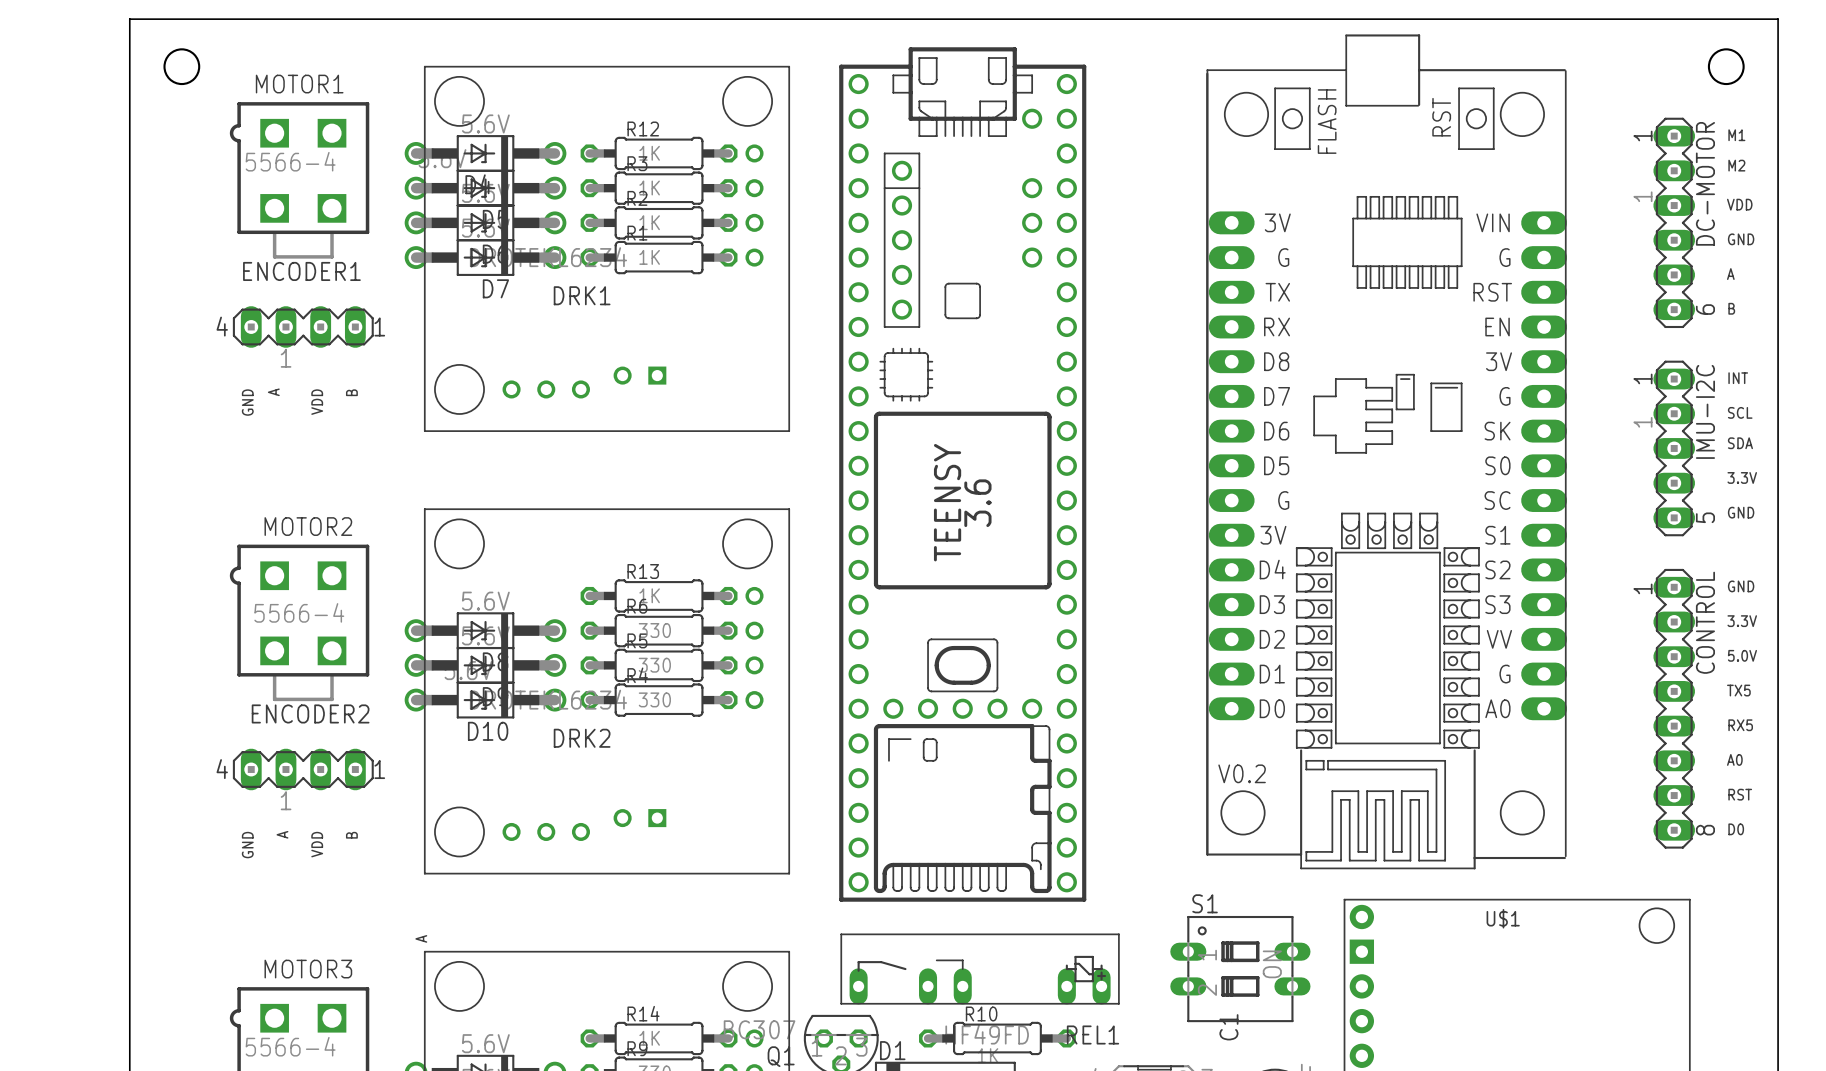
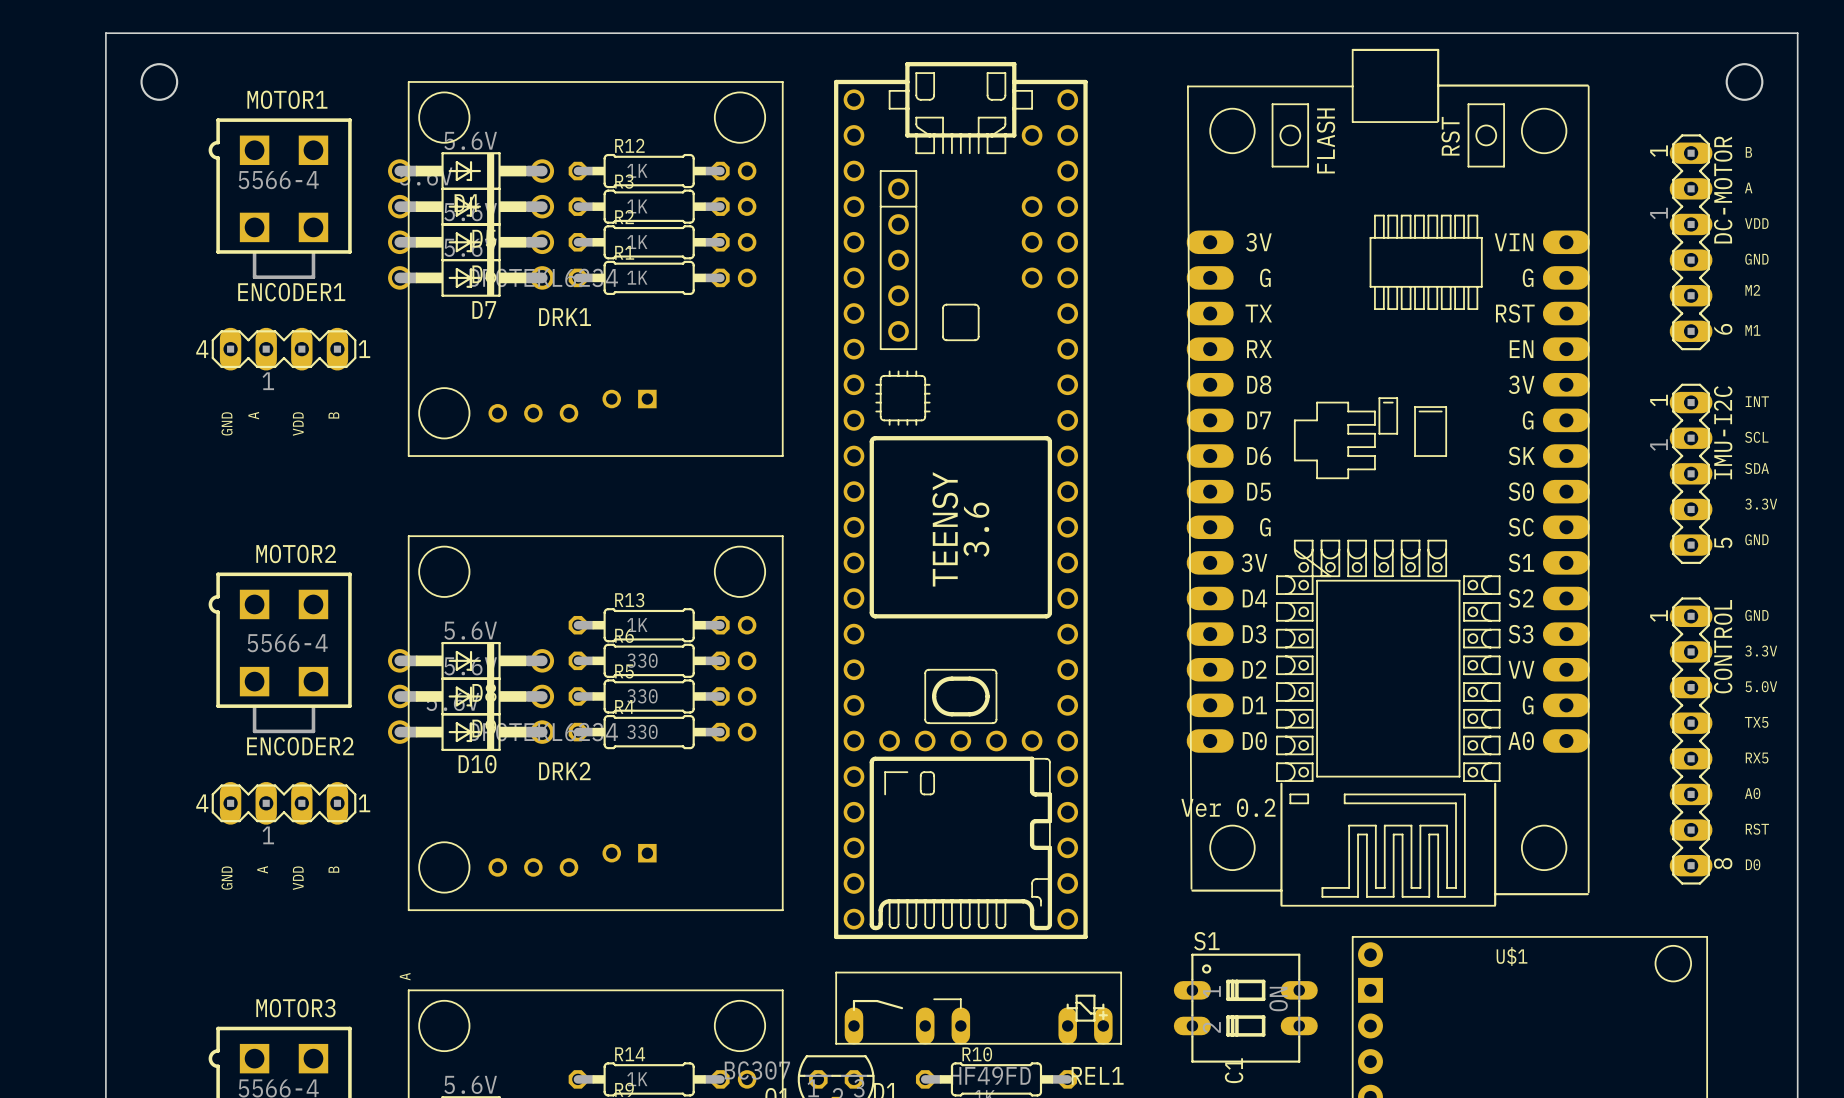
part footprint: [1206, 34, 1567, 870] -> [1186, 48, 1590, 907]
text: M1 (1736, 135) -> B (1748, 152)
text: M2 (1736, 165) -> A (1748, 187)
text: A (1730, 274) -> M2 (1752, 290)
text: B (1731, 308) -> M1 (1752, 330)

